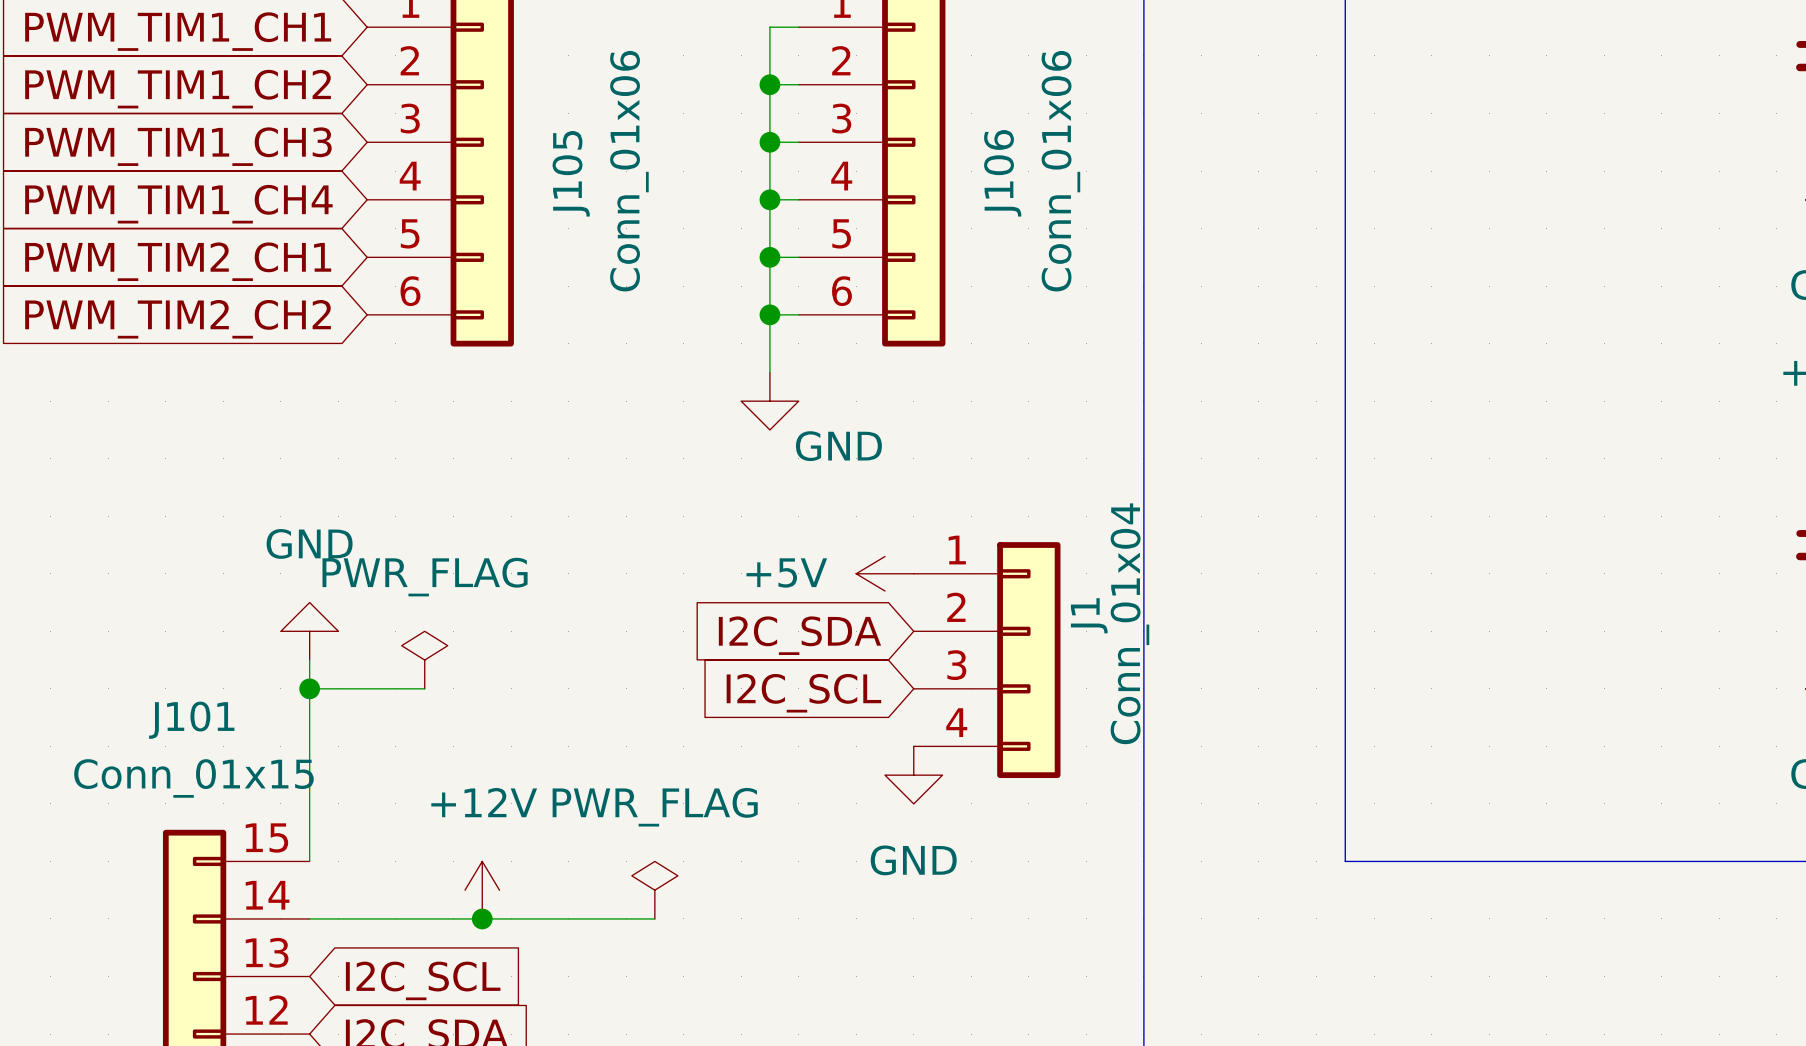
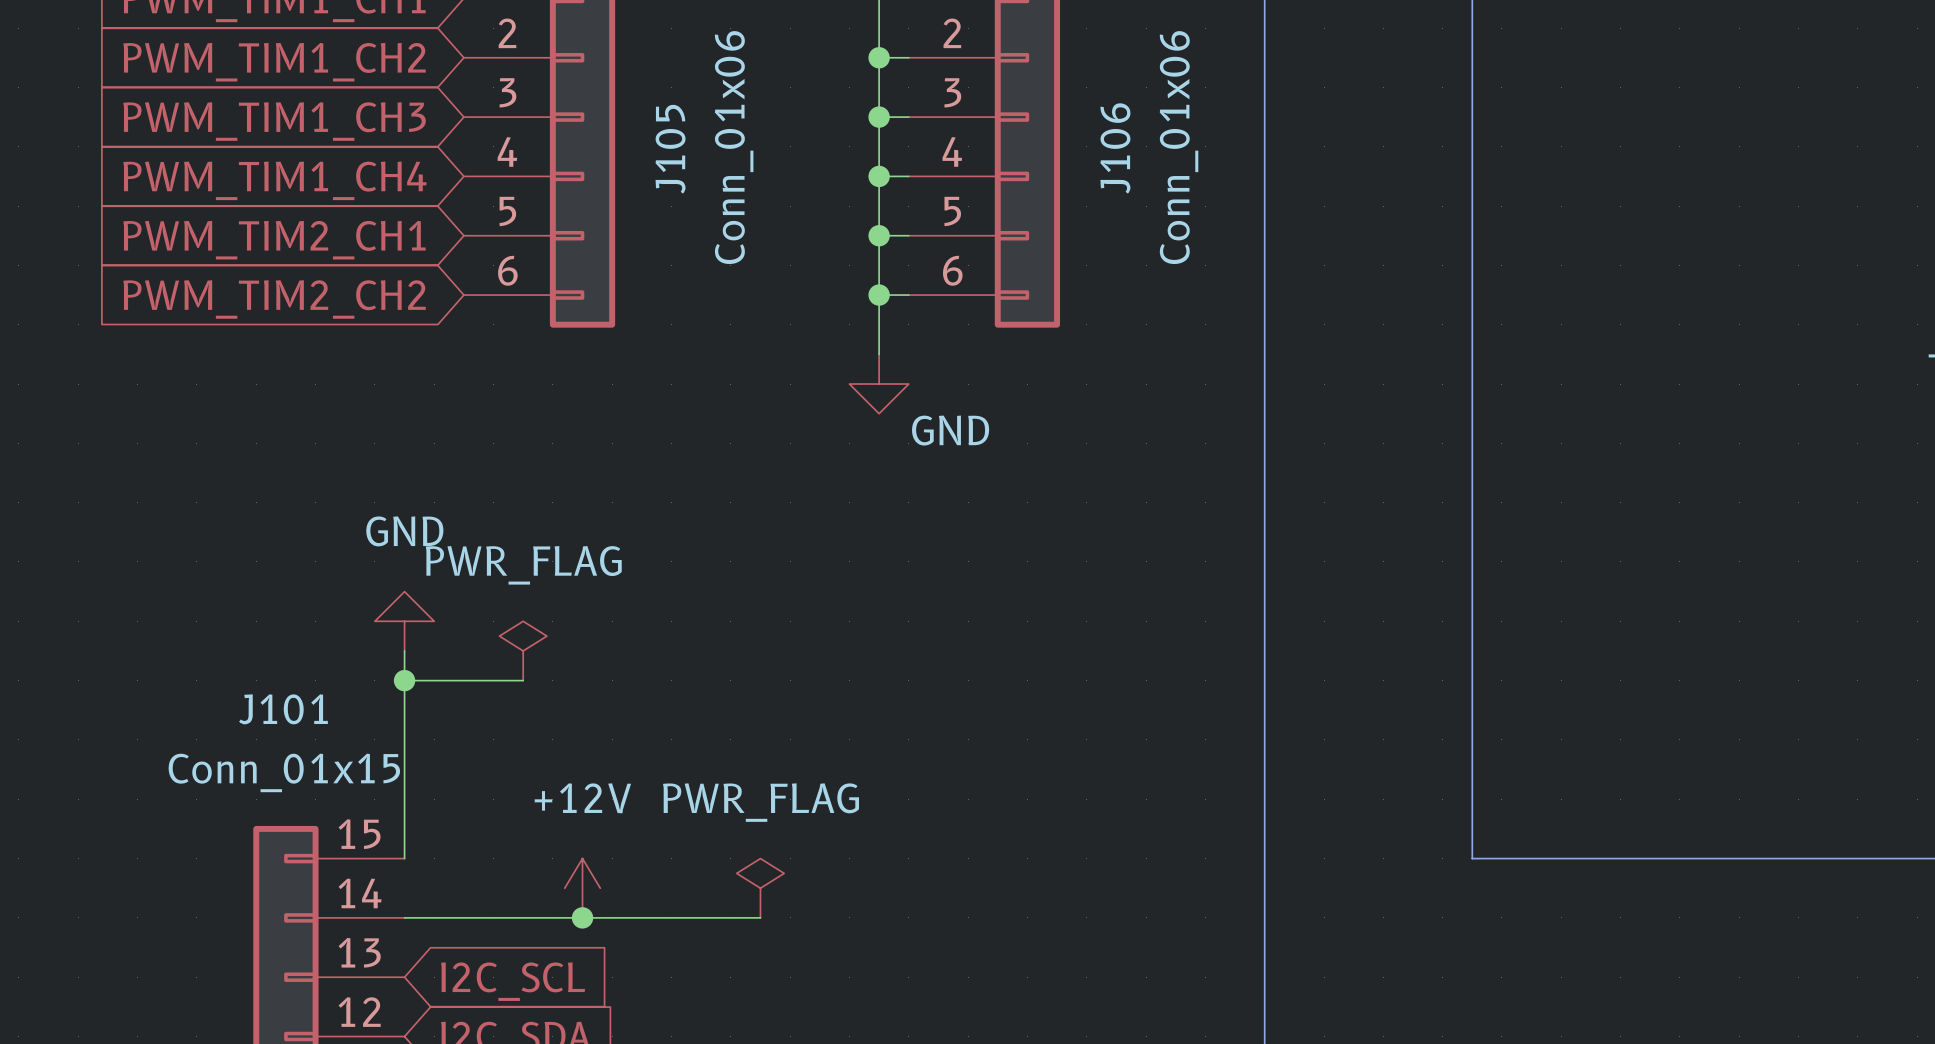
power symbol: +5V (885, 573) -> none
global label: I2C_SDA (799, 635) -> none
J1: Conn_01x04 (987, 660) -> none
global label: I2C_SCL (803, 693) -> none
power symbol: GND (913, 775) -> none

